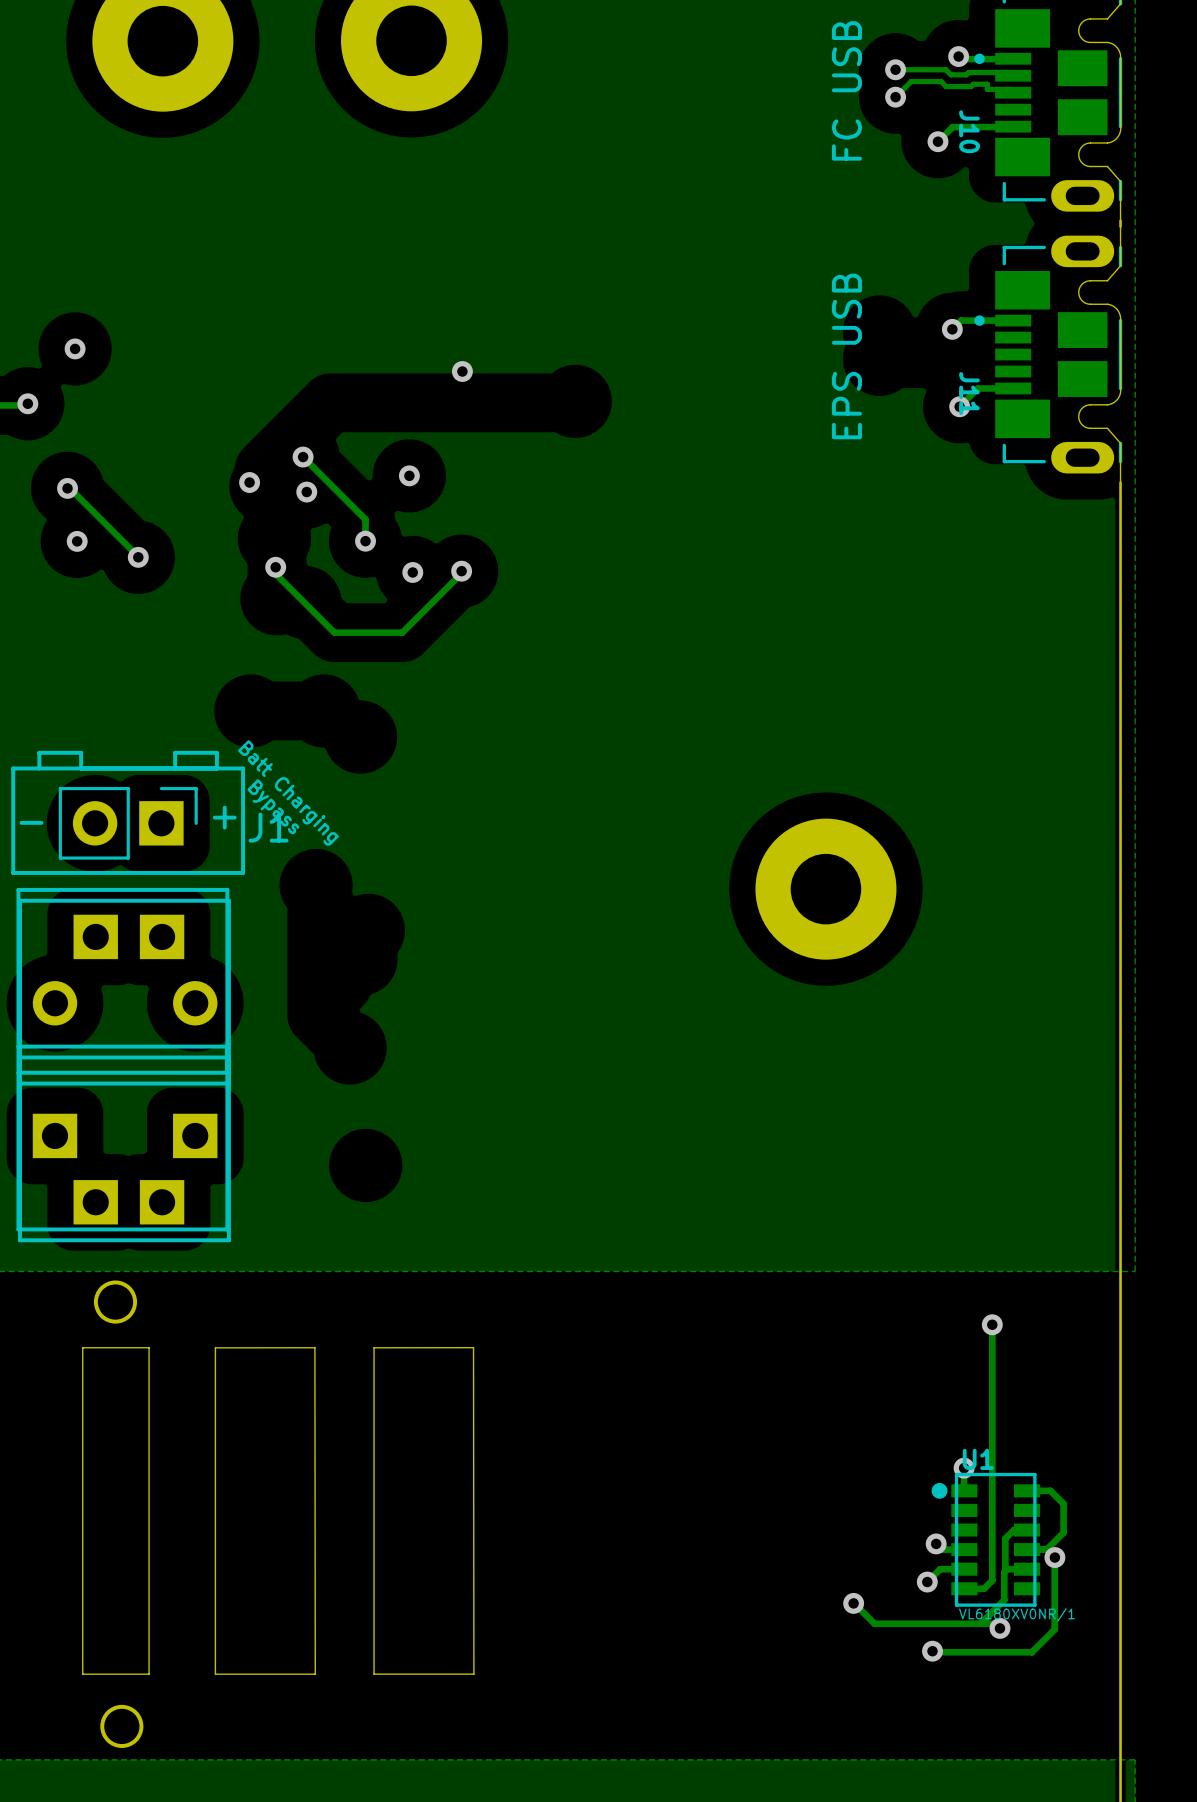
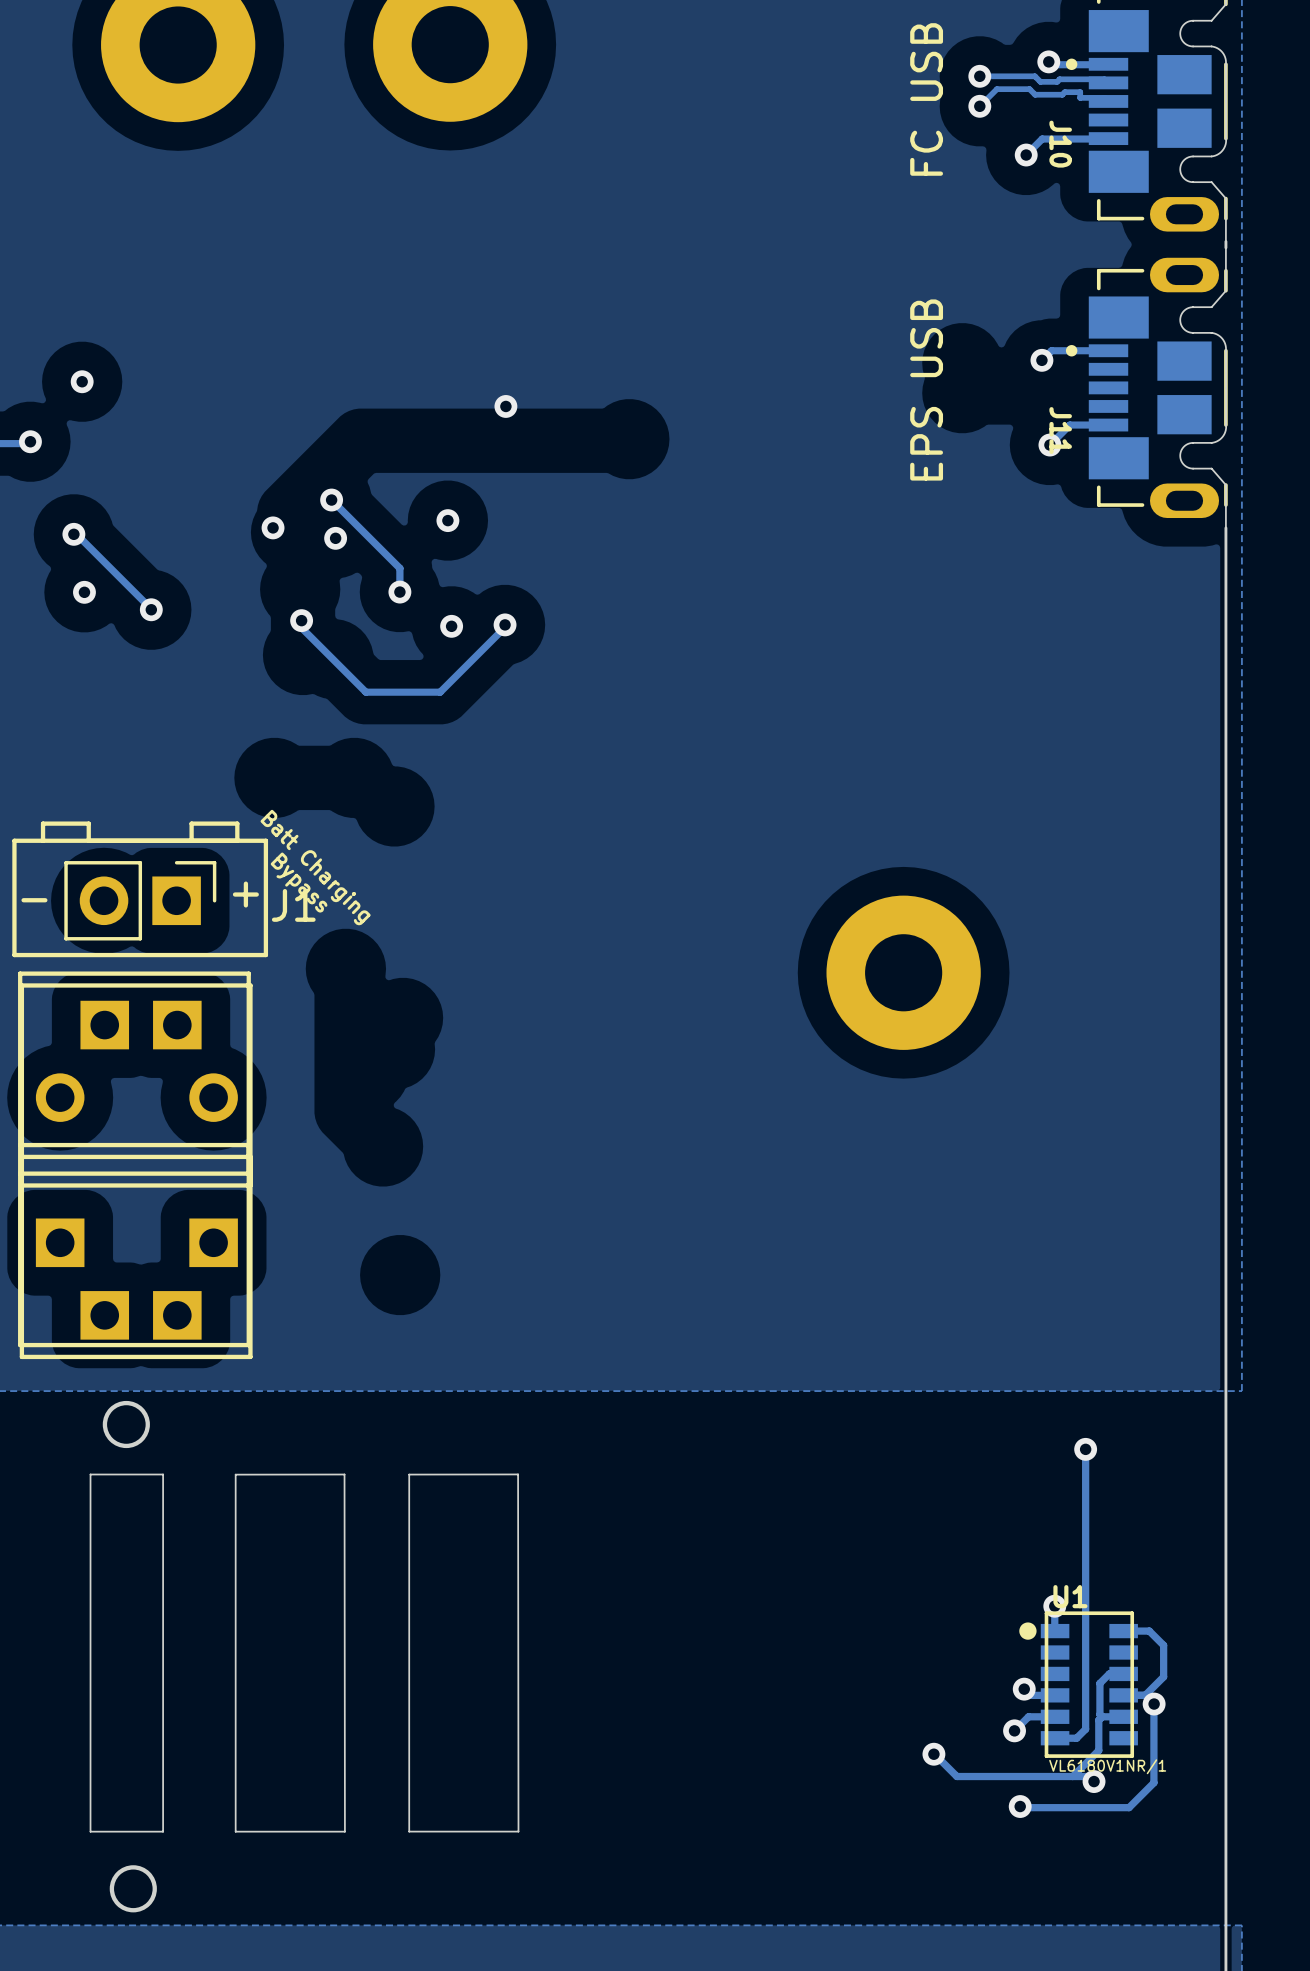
U1 value: VL6180XV0NR/1 (1016, 1614) -> VL6180V1NR/1 (1107, 1766)

